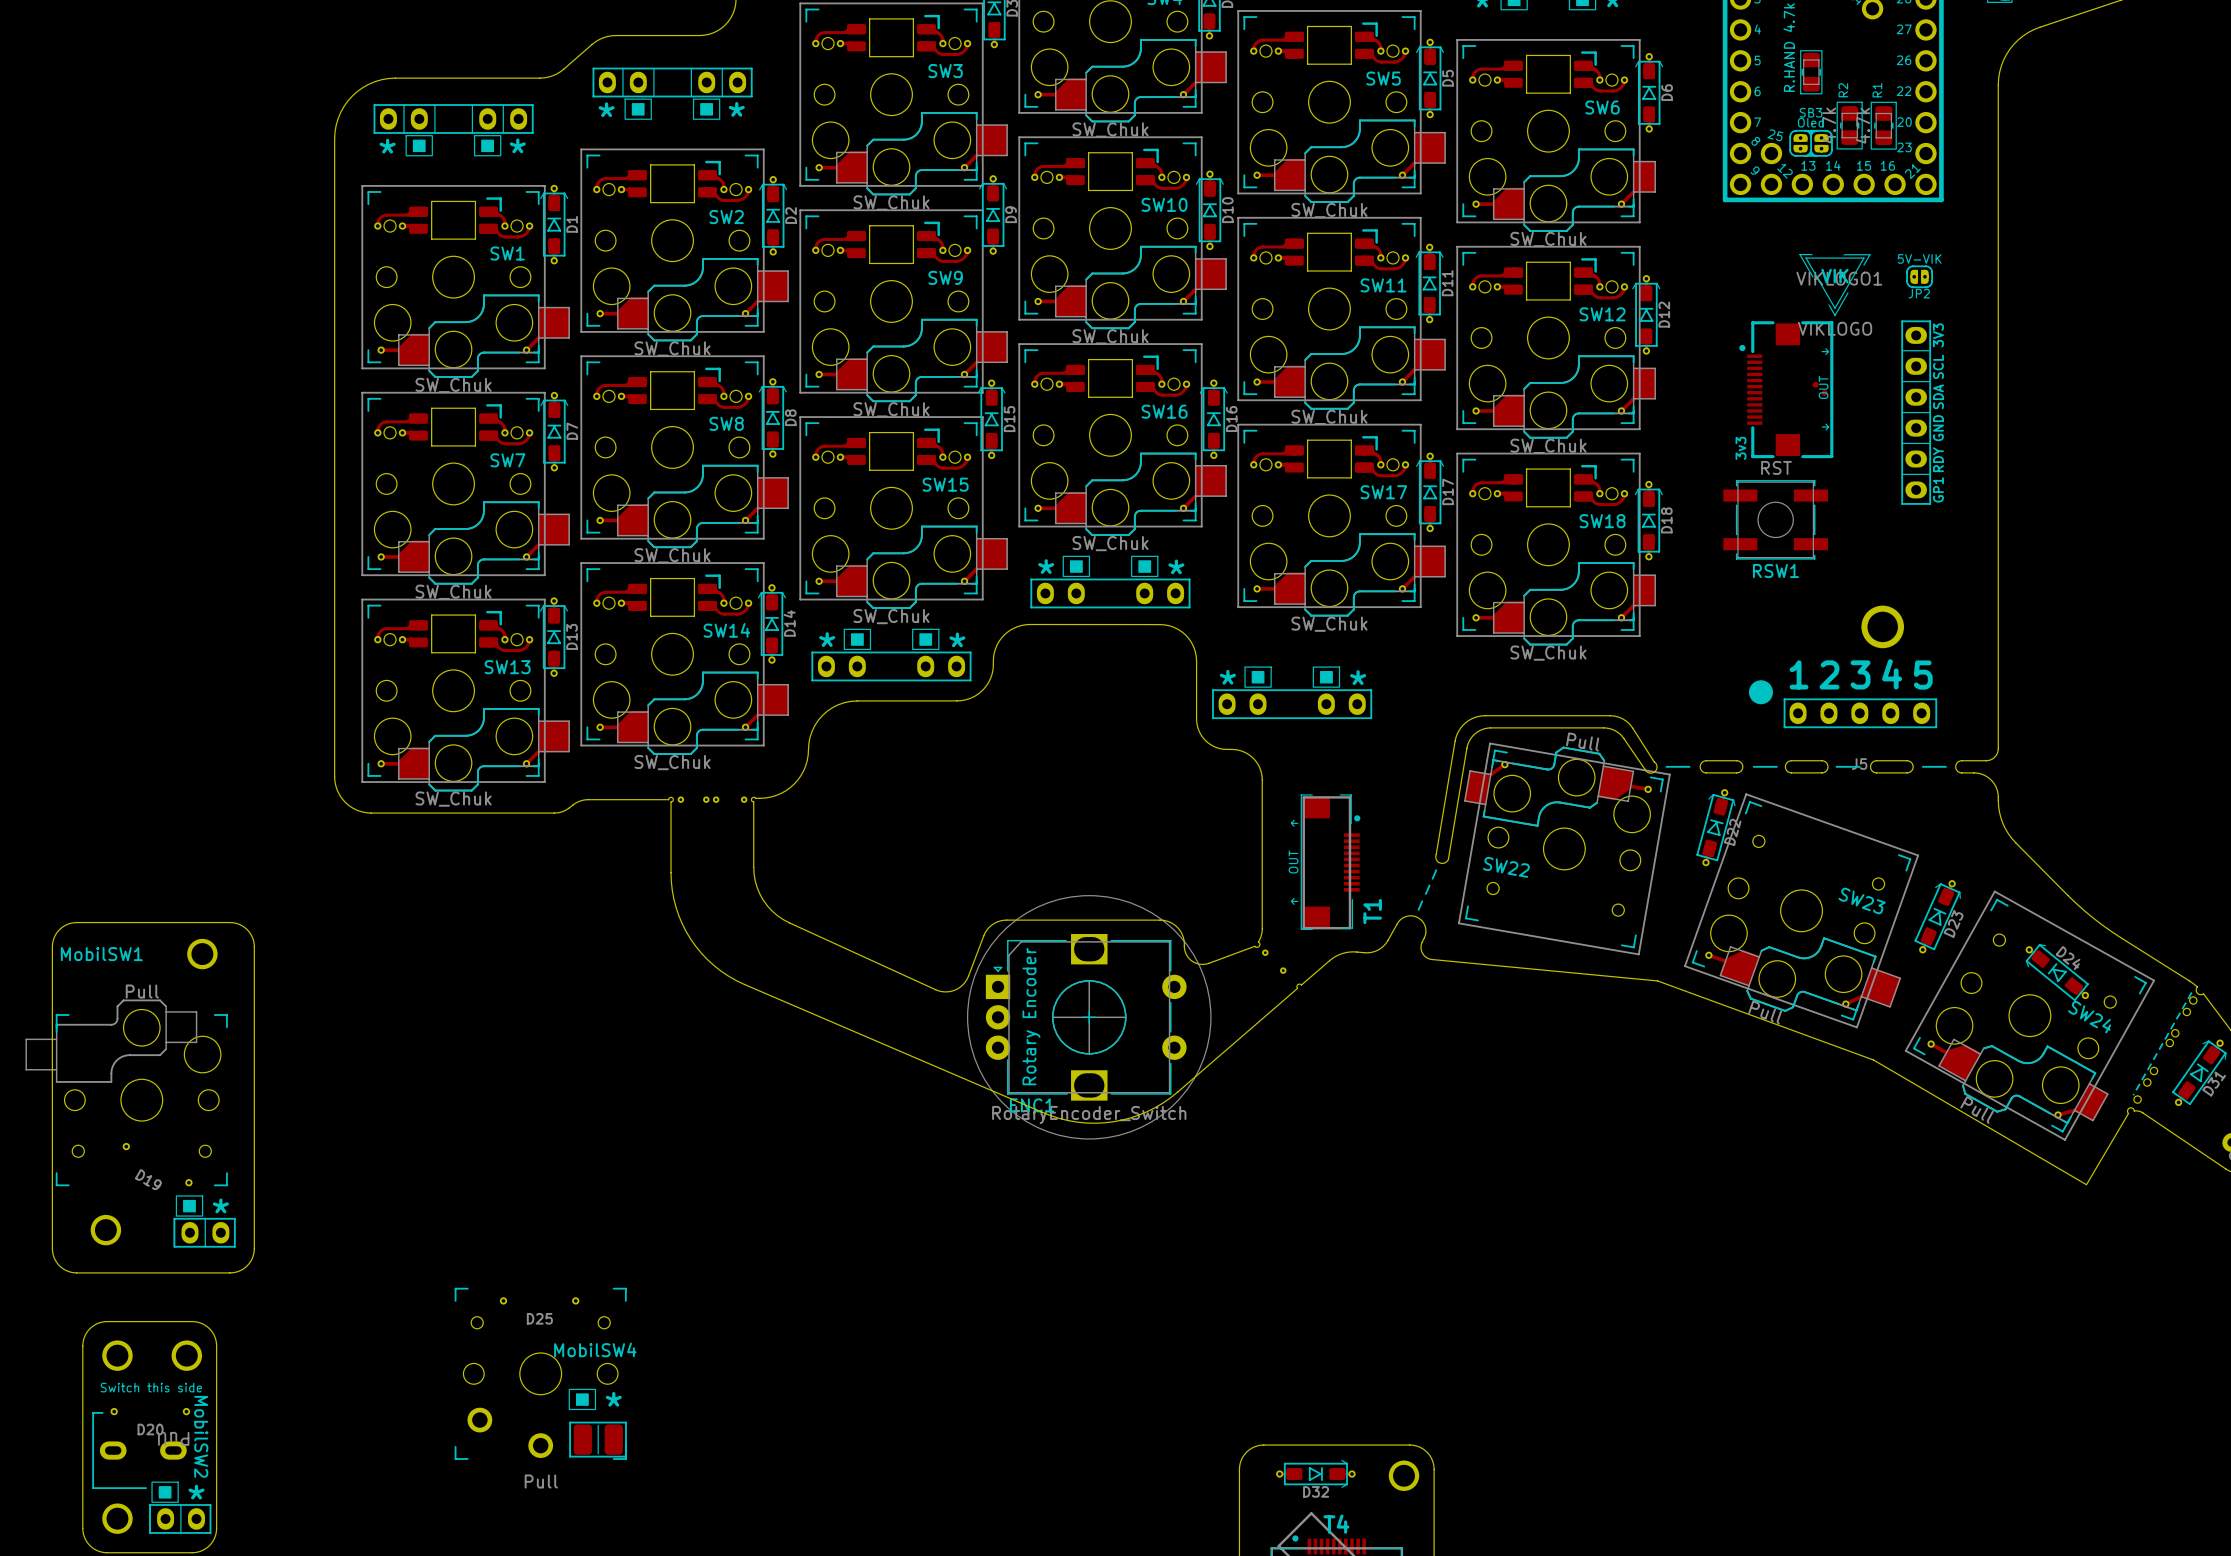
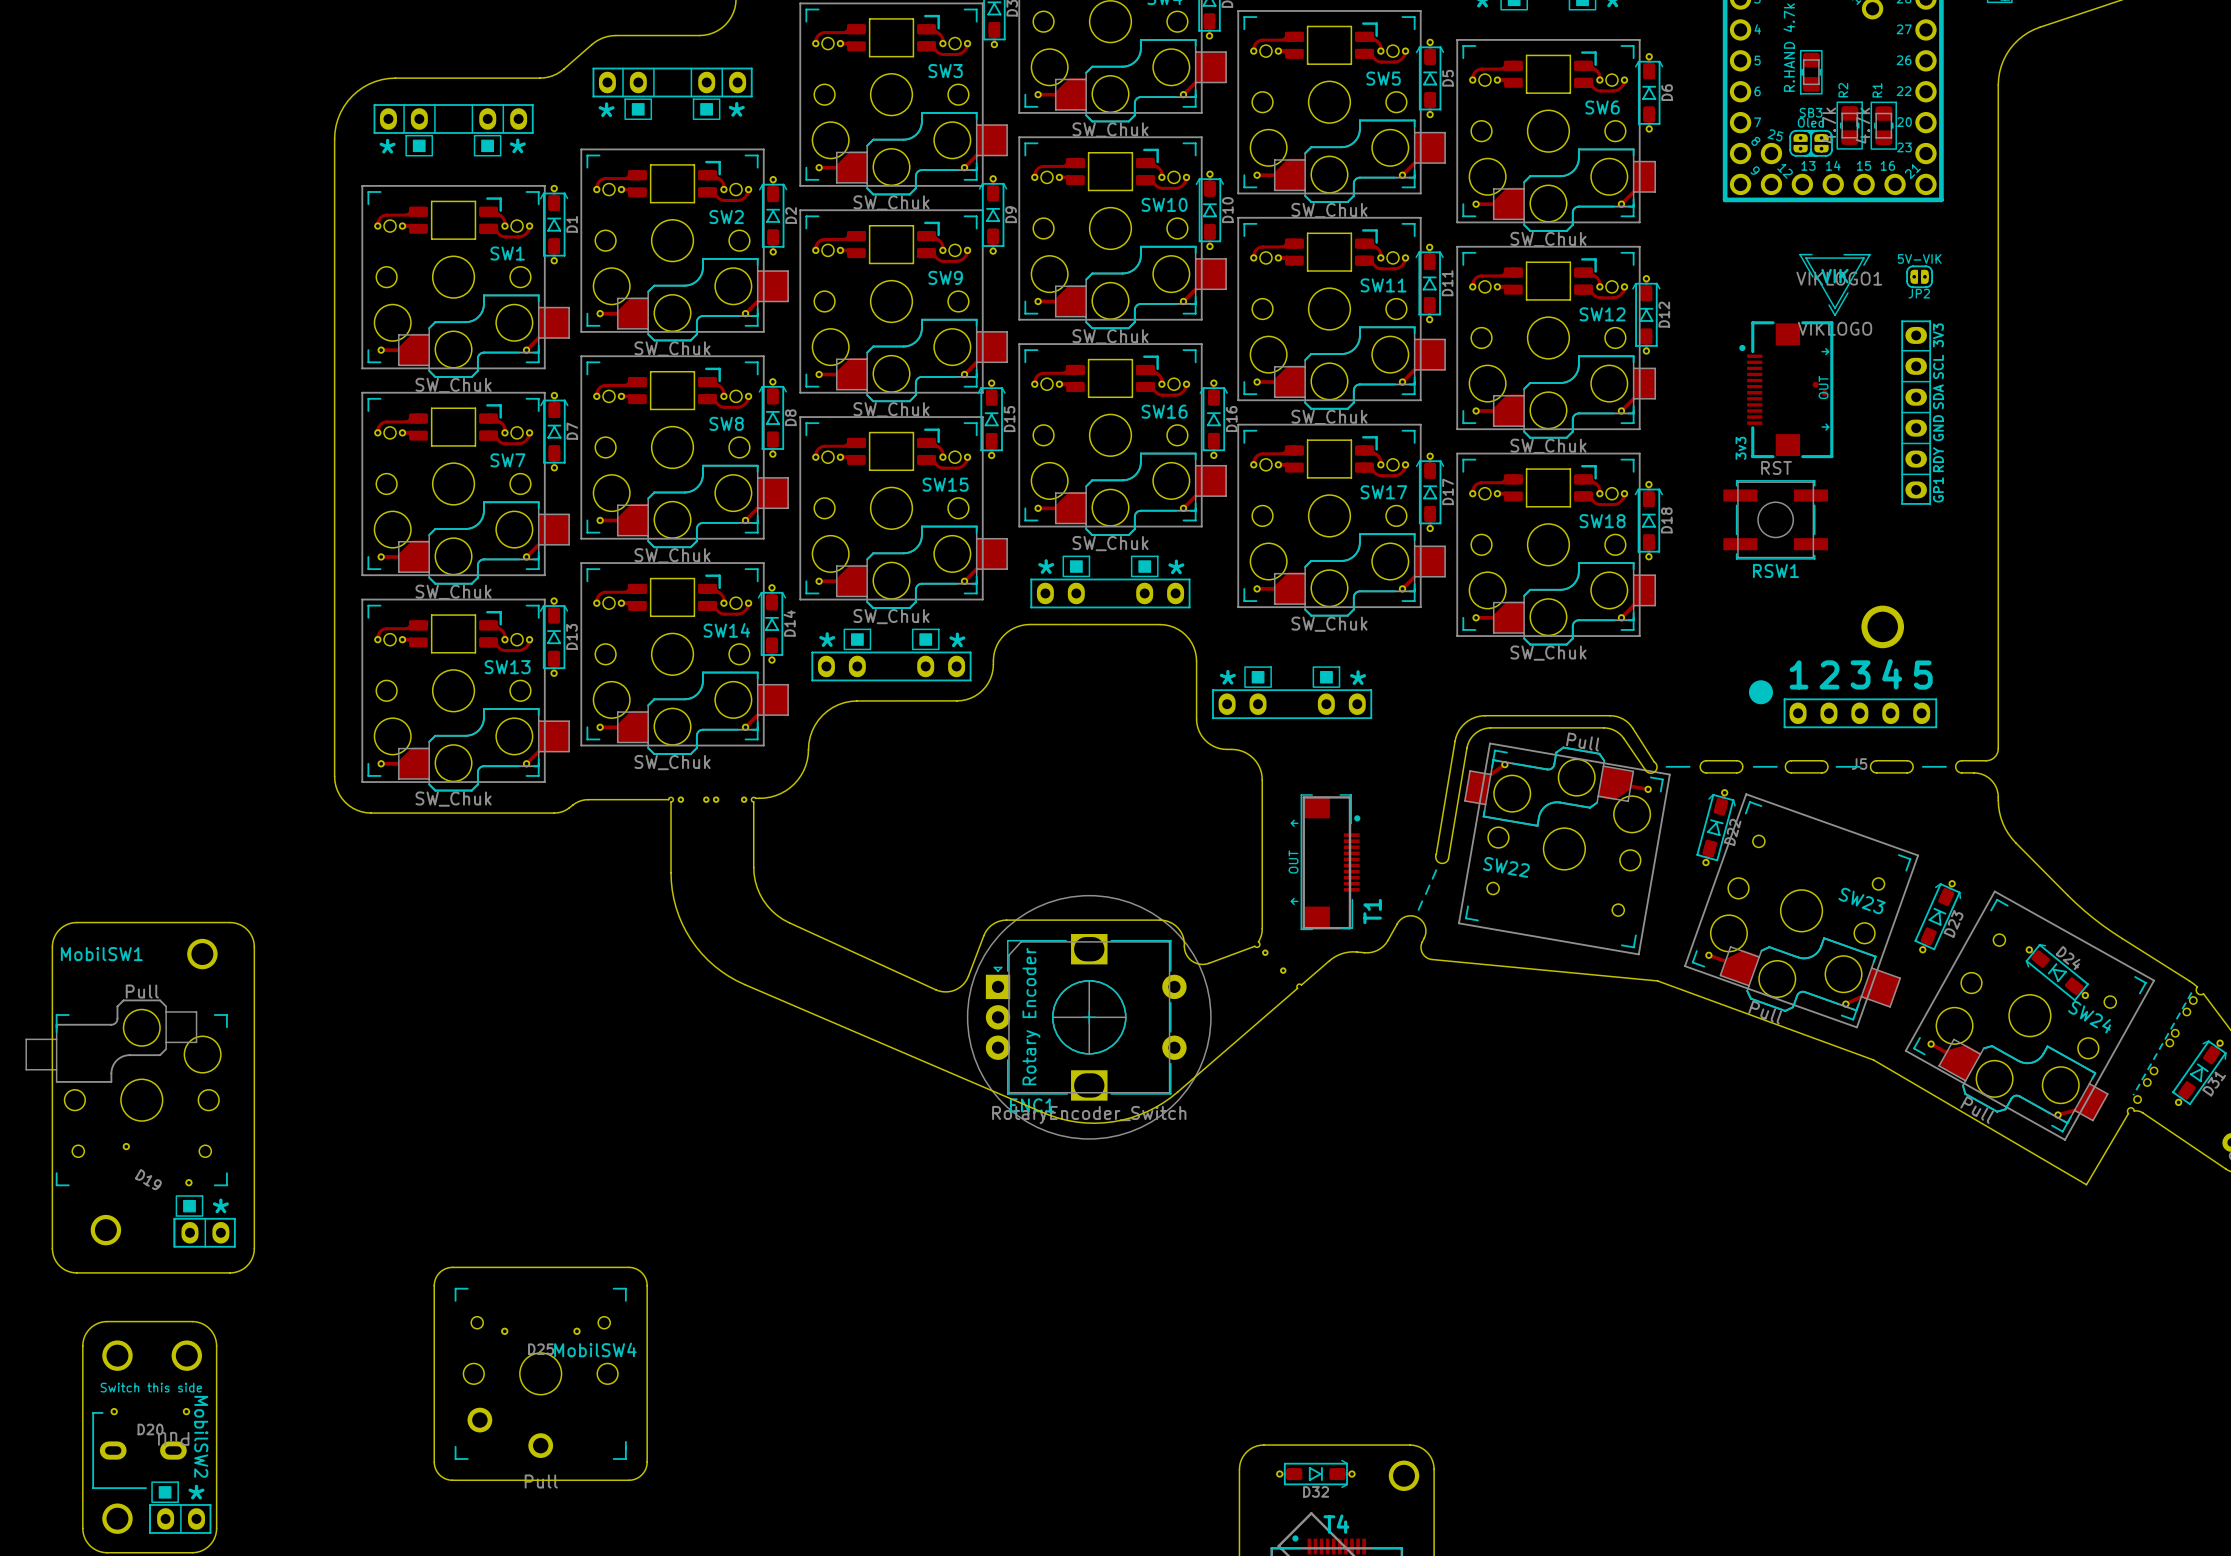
board edge: none -> (452, 1267) (628, 1267) (641, 1272) (647, 1285) (647, 1462) (641, 1474) (628, 1480) (452, 1480) (439, 1474) (434, 1462) (434, 1285) (439, 1272) (452, 1267)
D25 position: (539, 1300) -> (540, 1331)
part: (597, 1423) -> none

